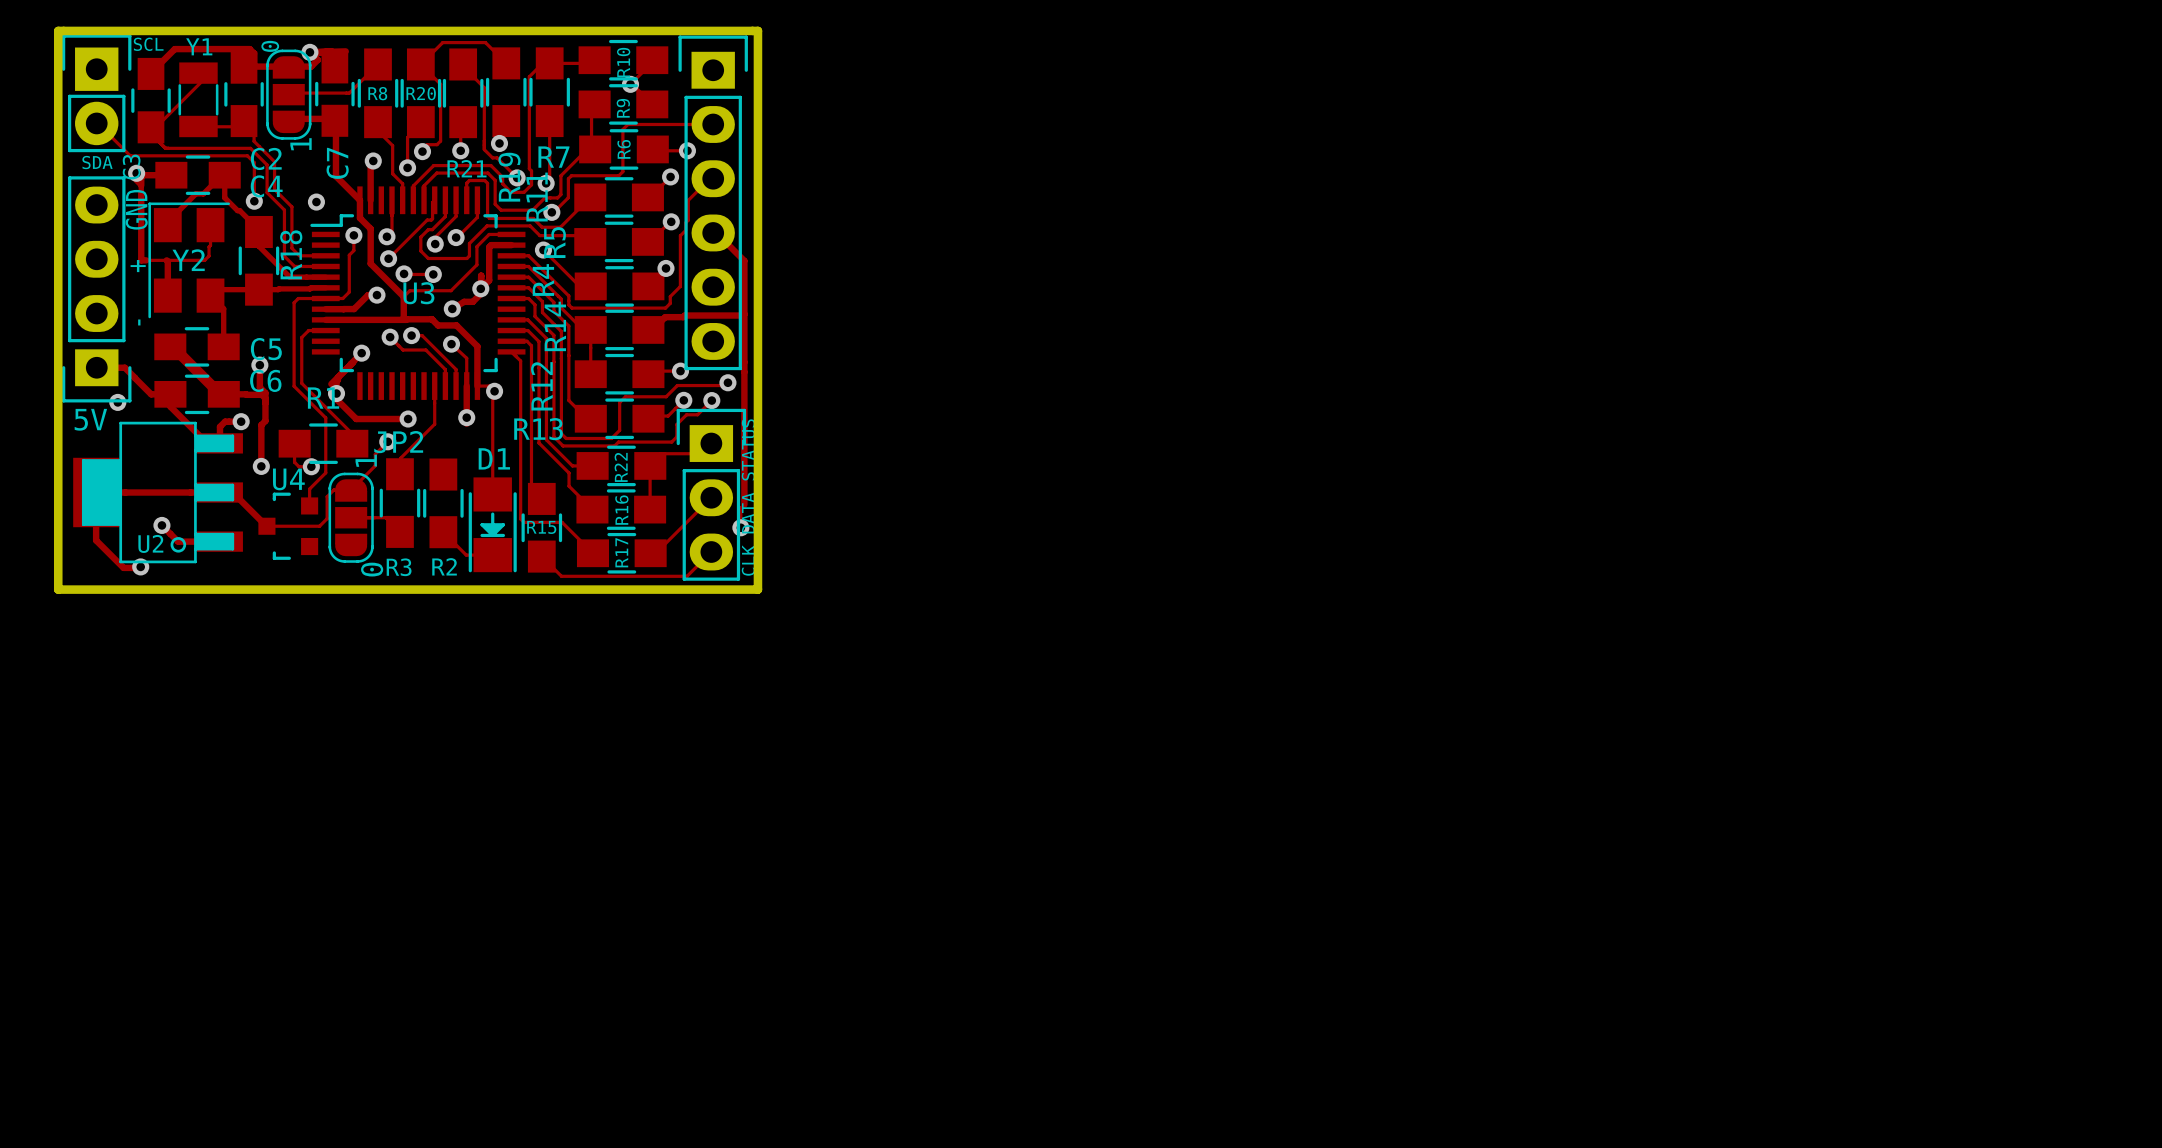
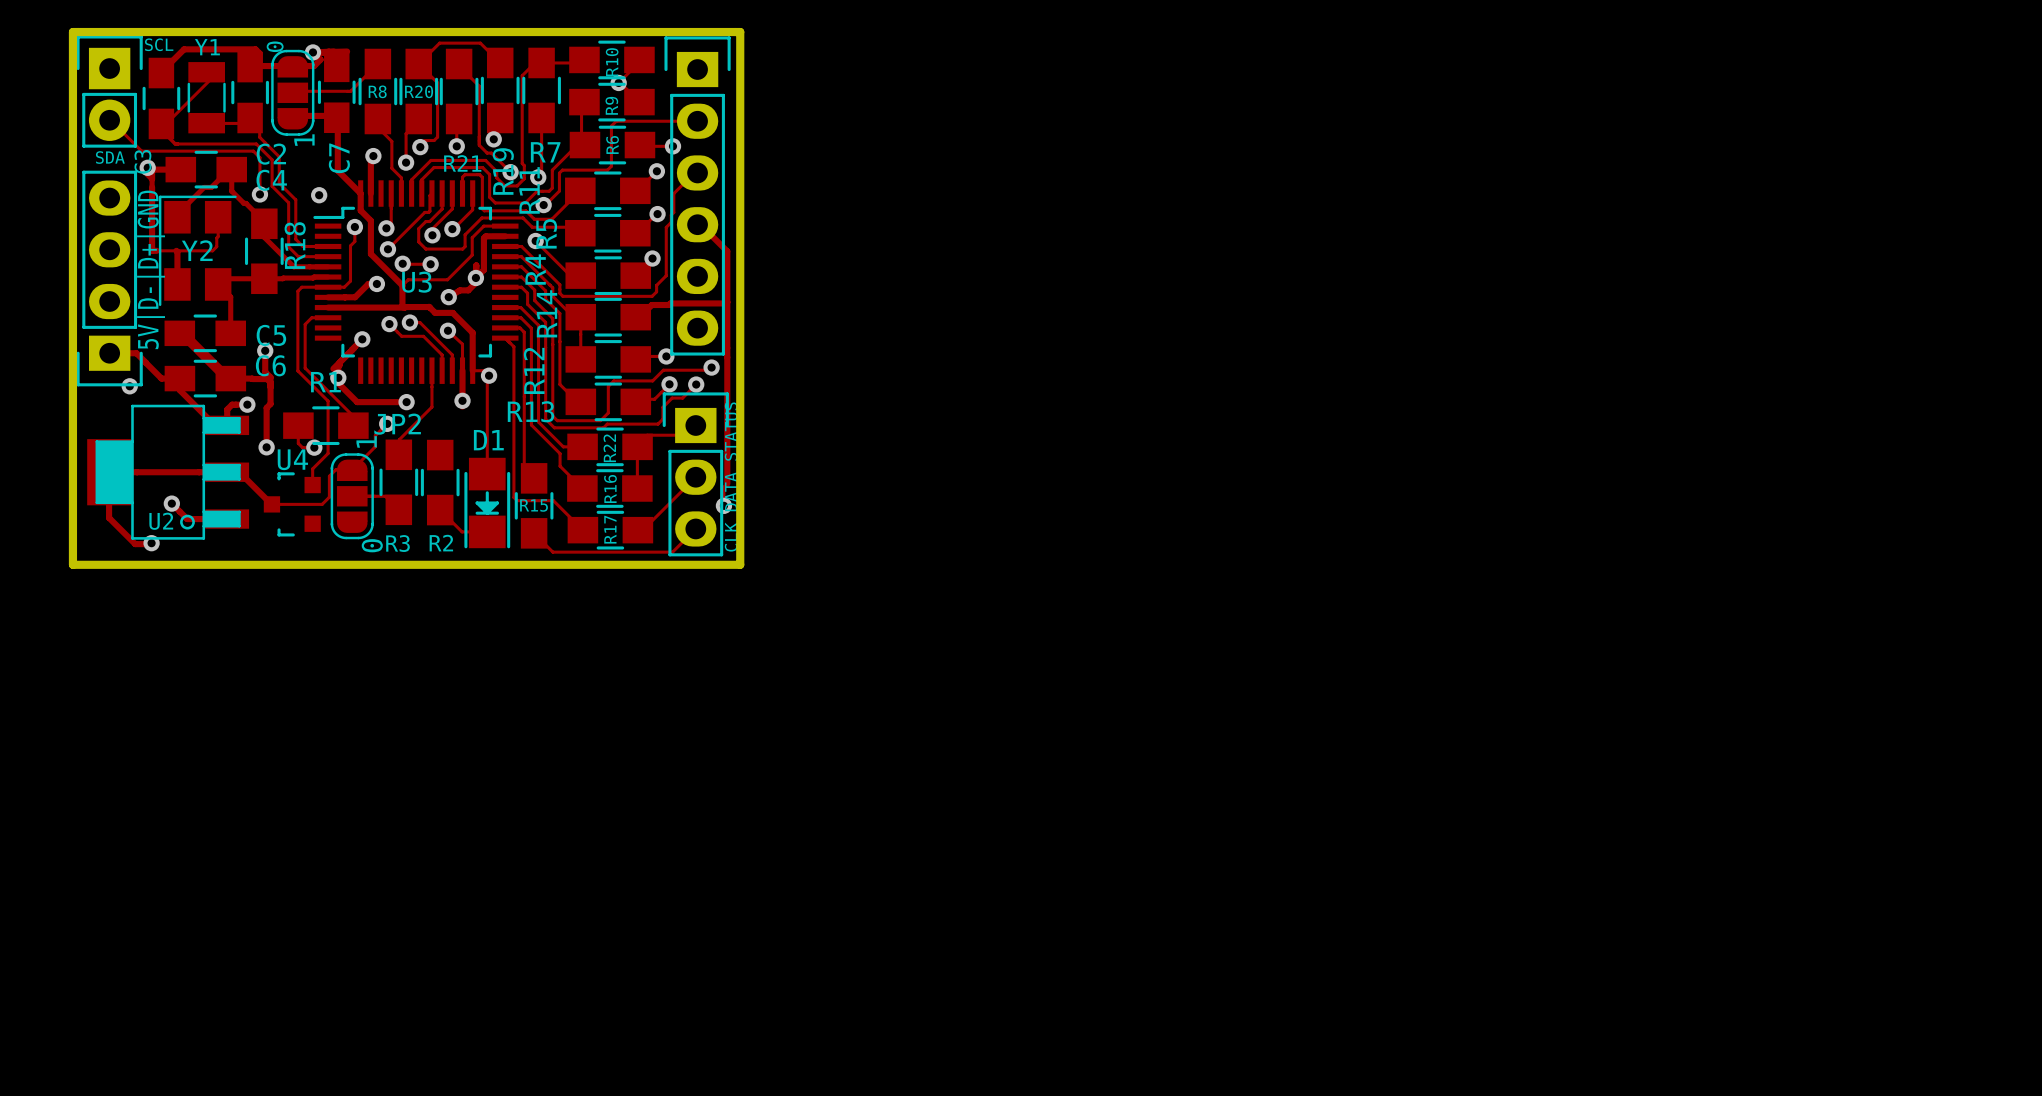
text: - + GND (136, 257) -> 5V|D-|D+|GND (151, 269)
text: 5V (90, 419) -> none

